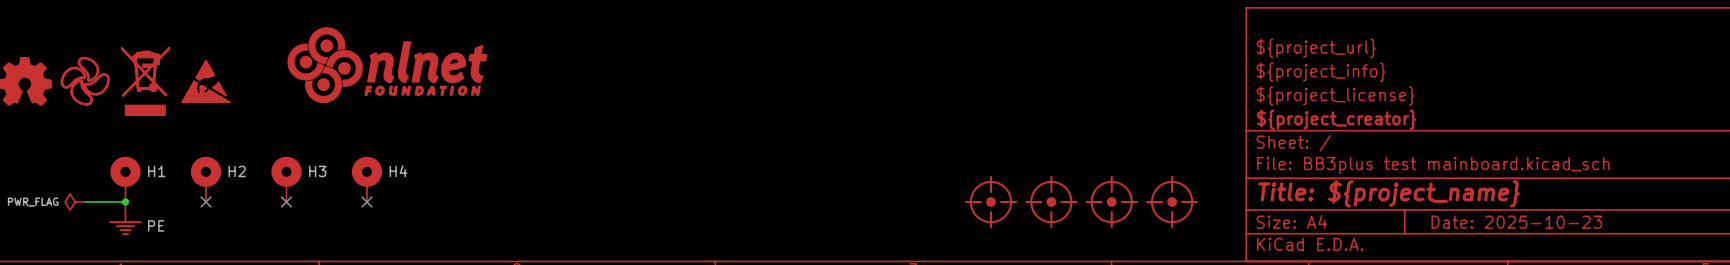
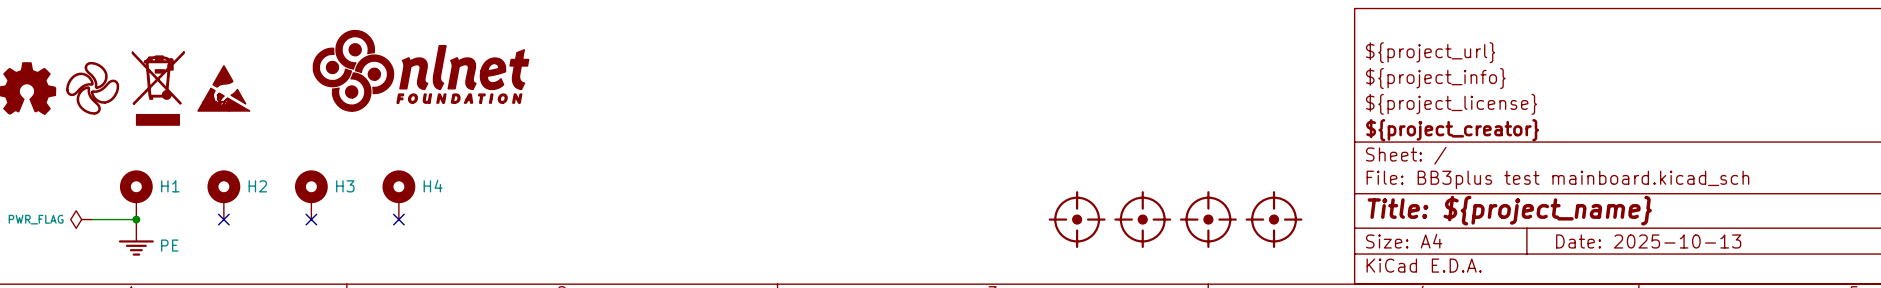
title block: Date: 2025-10-23 (1516, 222) -> Date: 2025-10-13 (1648, 241)

